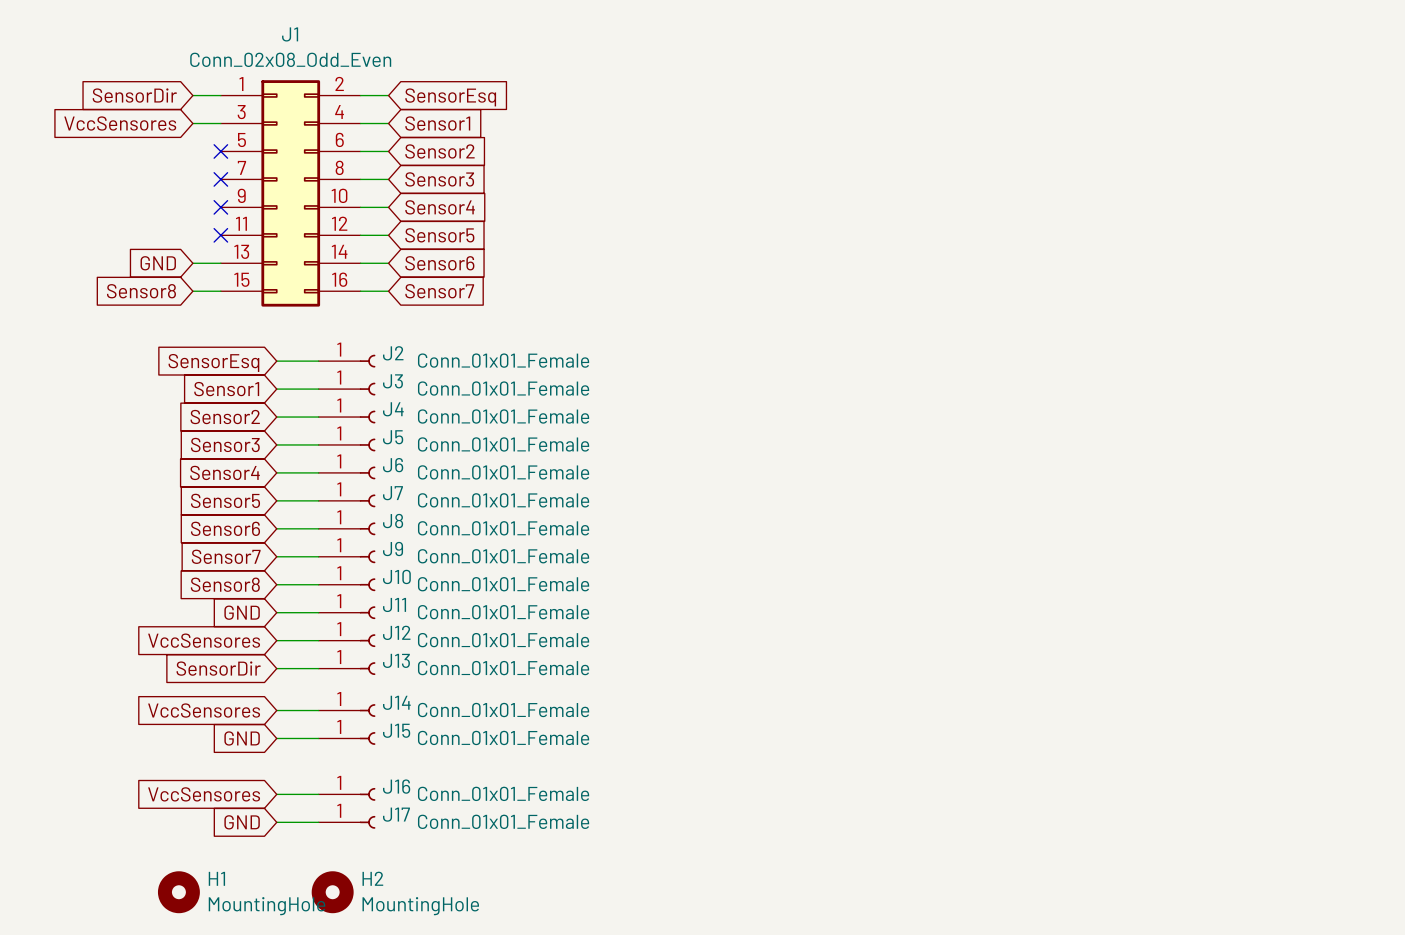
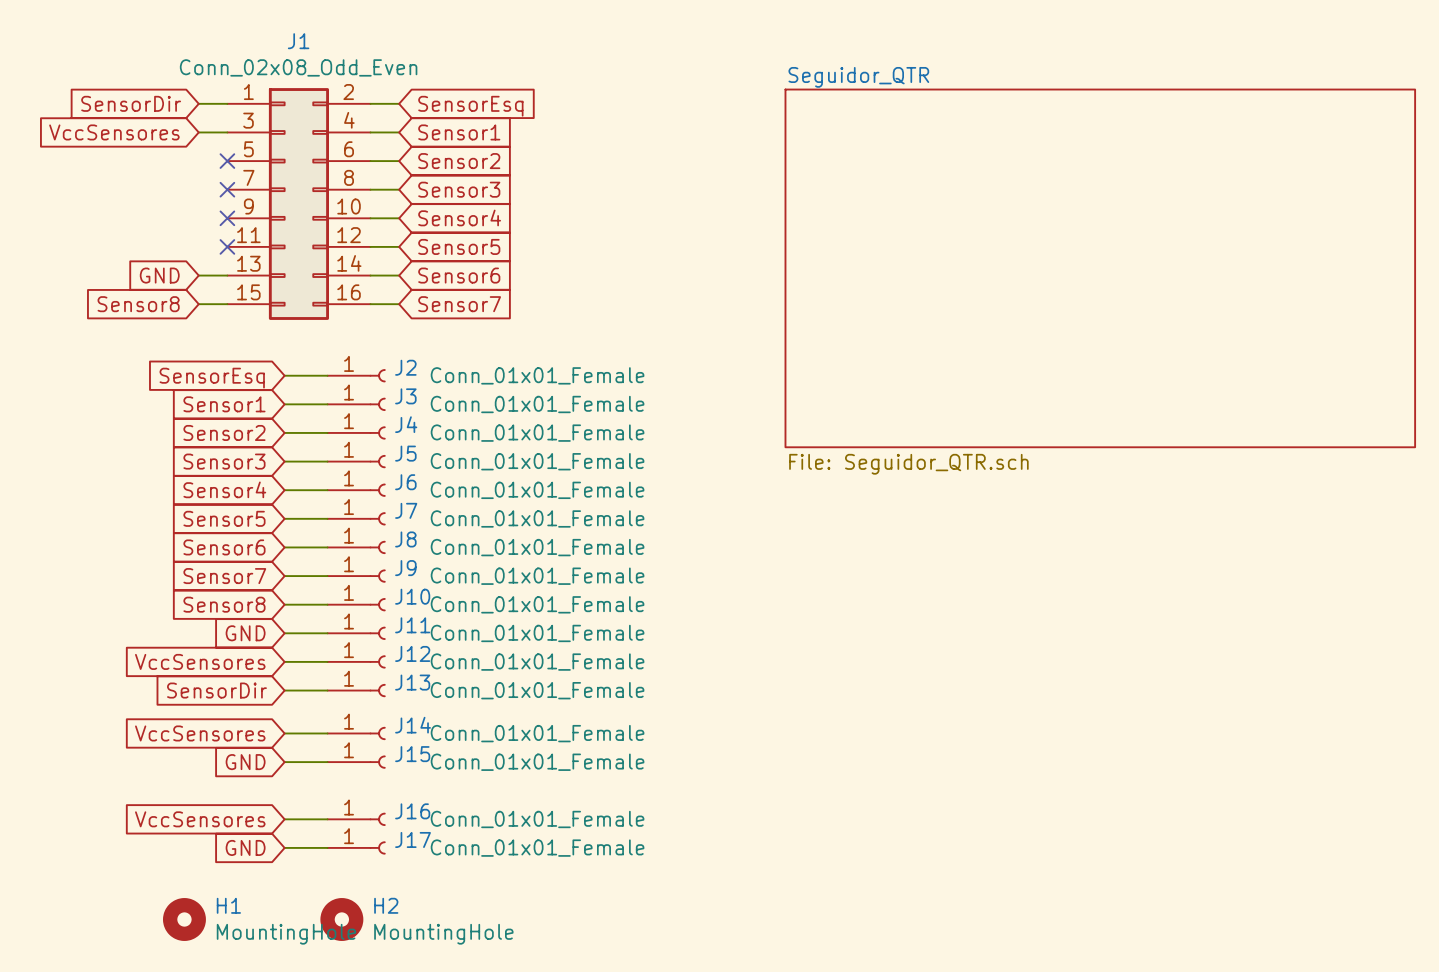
sheet Seguidor_QTR: none -> File: Seguidor_QTR.sch (1100, 268)

